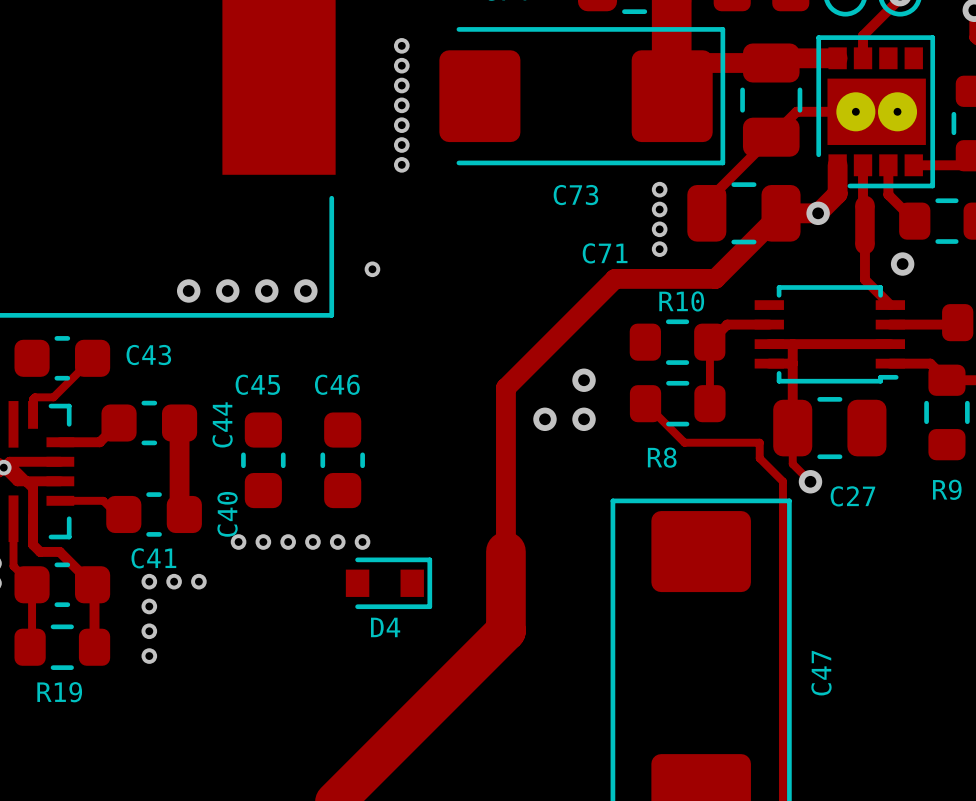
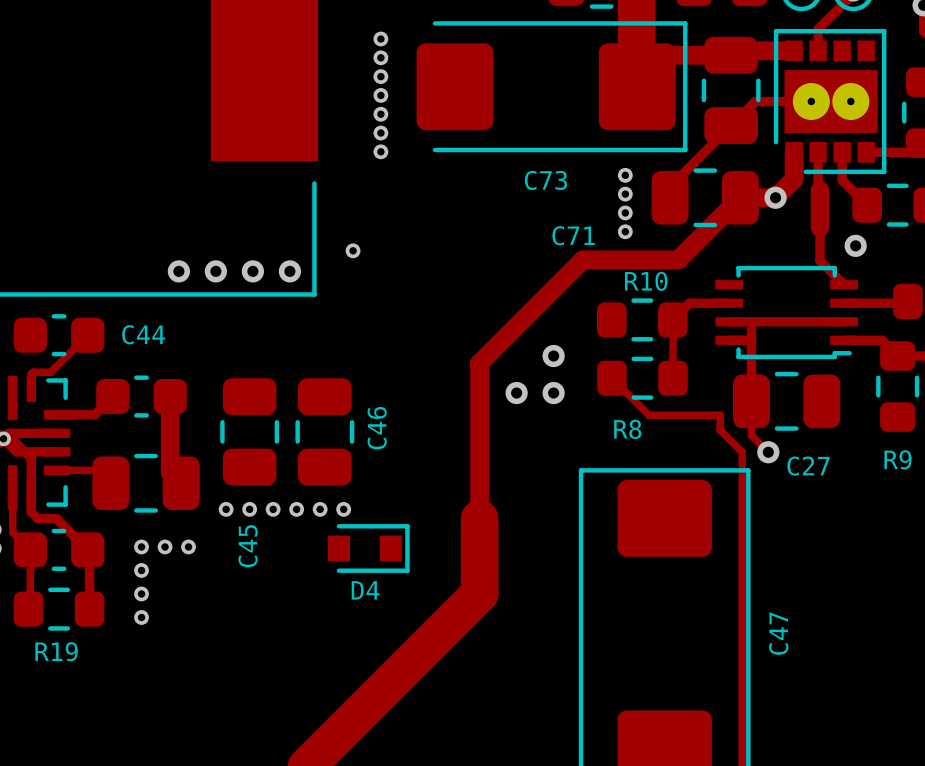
C43 name: C43 (148, 355) -> none
C45 name rotation: 0° (257, 384) -> 90° counterclockwise (248, 546)
C45 name position: C45 (257, 384) -> C45 (248, 546)
C46 name rotation: 0° (337, 384) -> 90° counterclockwise (377, 428)
C46 name position: C46 (337, 384) -> C46 (377, 428)
C45 footprint: [241, 412, 286, 509] -> [220, 378, 280, 486]
C46 footprint: [320, 412, 365, 509] -> [295, 378, 355, 486]
C44 name rotation: 0° (222, 424) -> 90° clockwise (143, 334)
C44 name position: C44 (222, 424) -> C44 (143, 334)
C40: (154, 514) -> none
part: none -> (146, 483)
C41 name: C41 (153, 558) -> none

